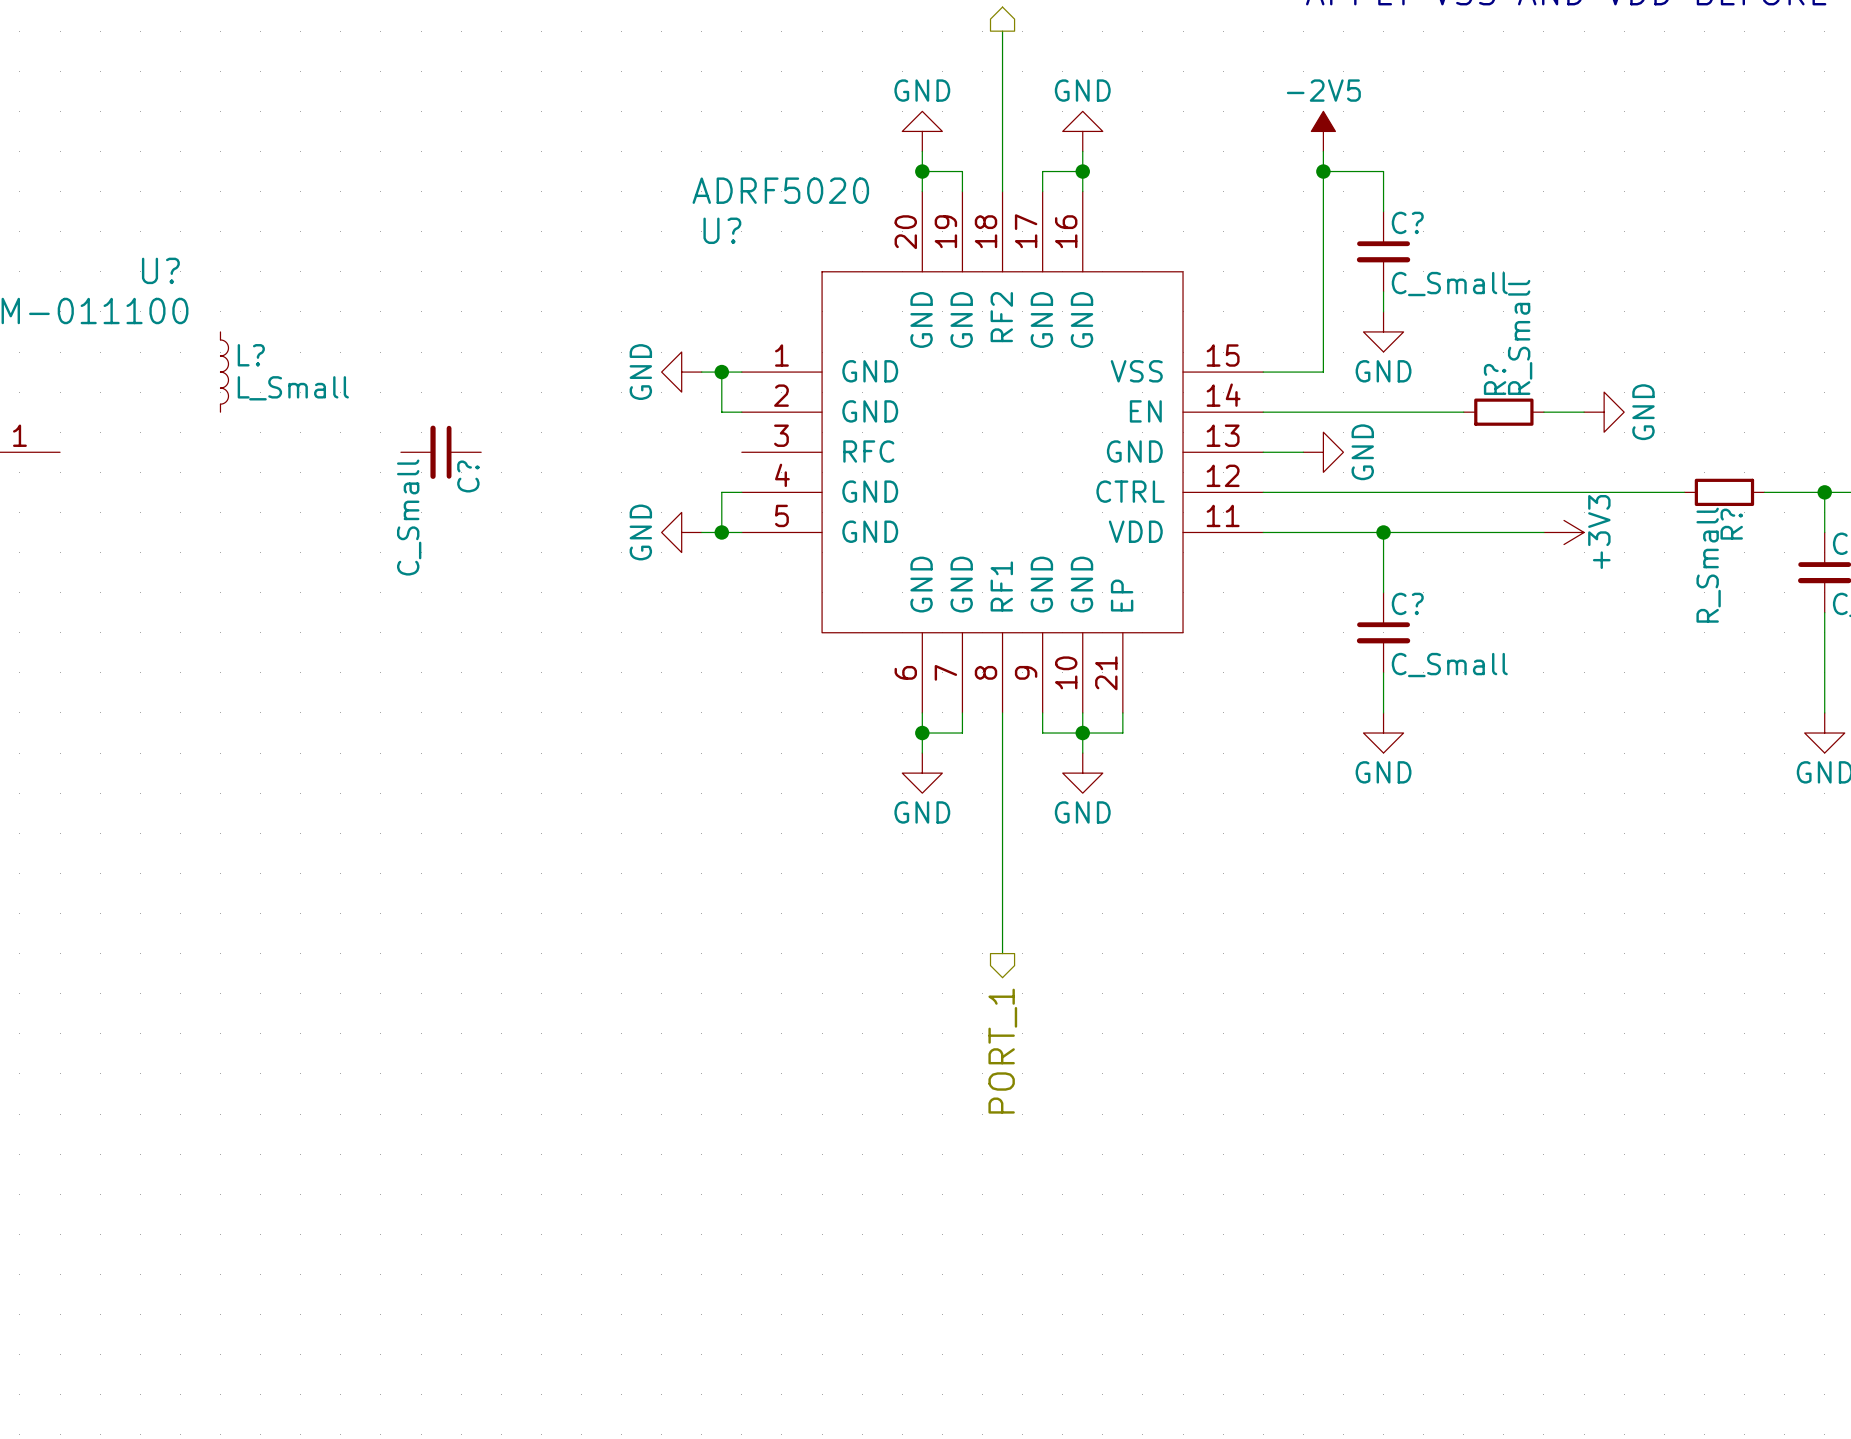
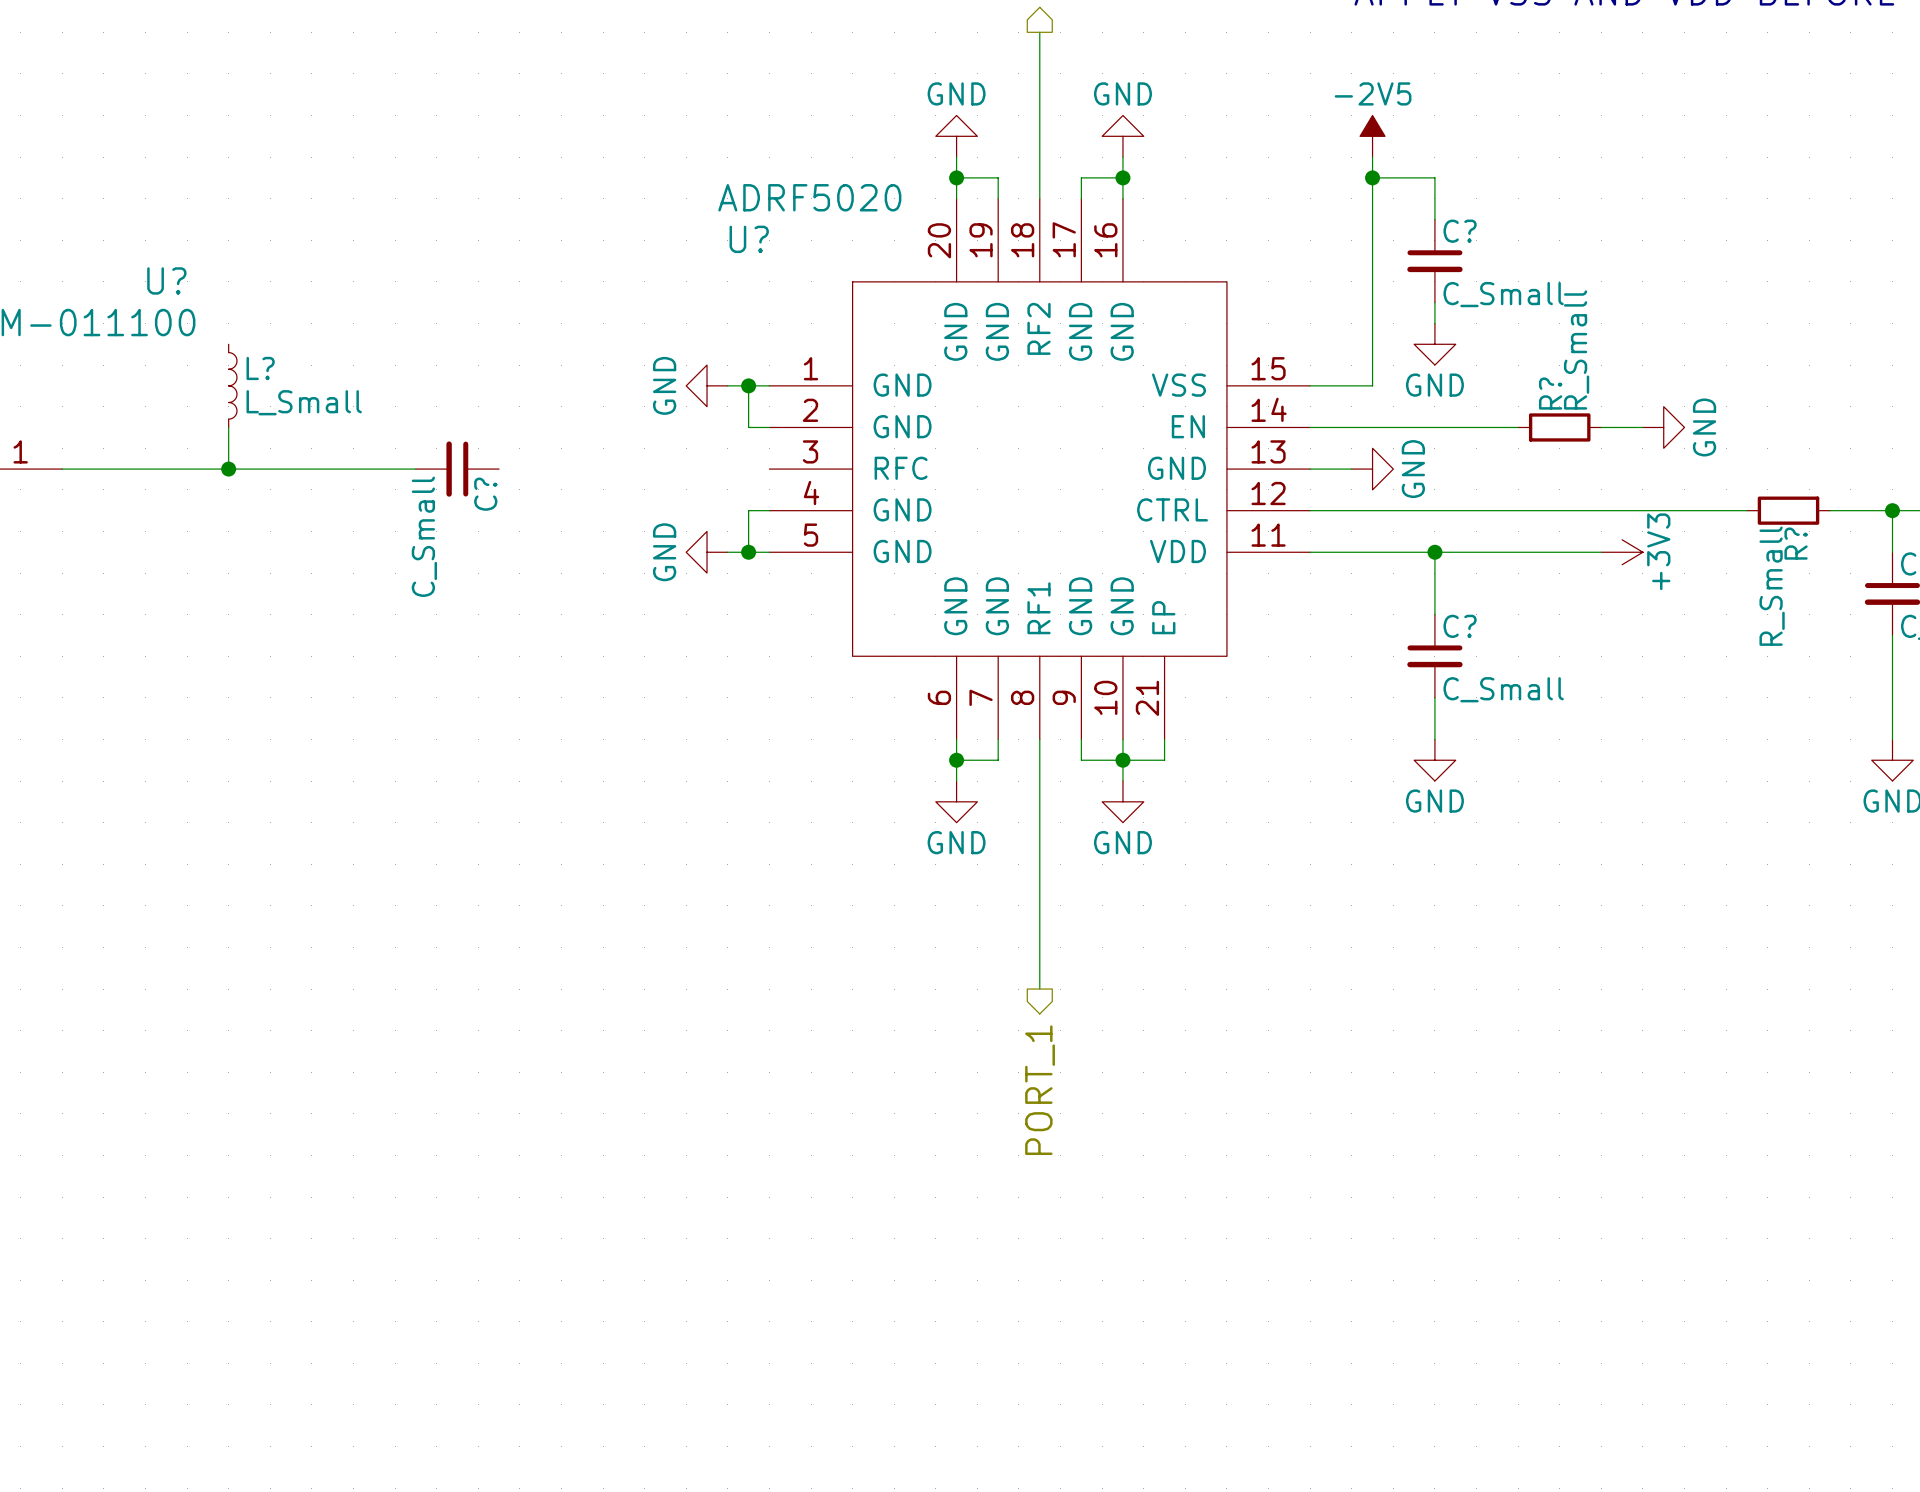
wire: none -> (228, 427) (228, 469)
wire: none -> (62, 469) (415, 469)
junction: none -> (228, 469)

